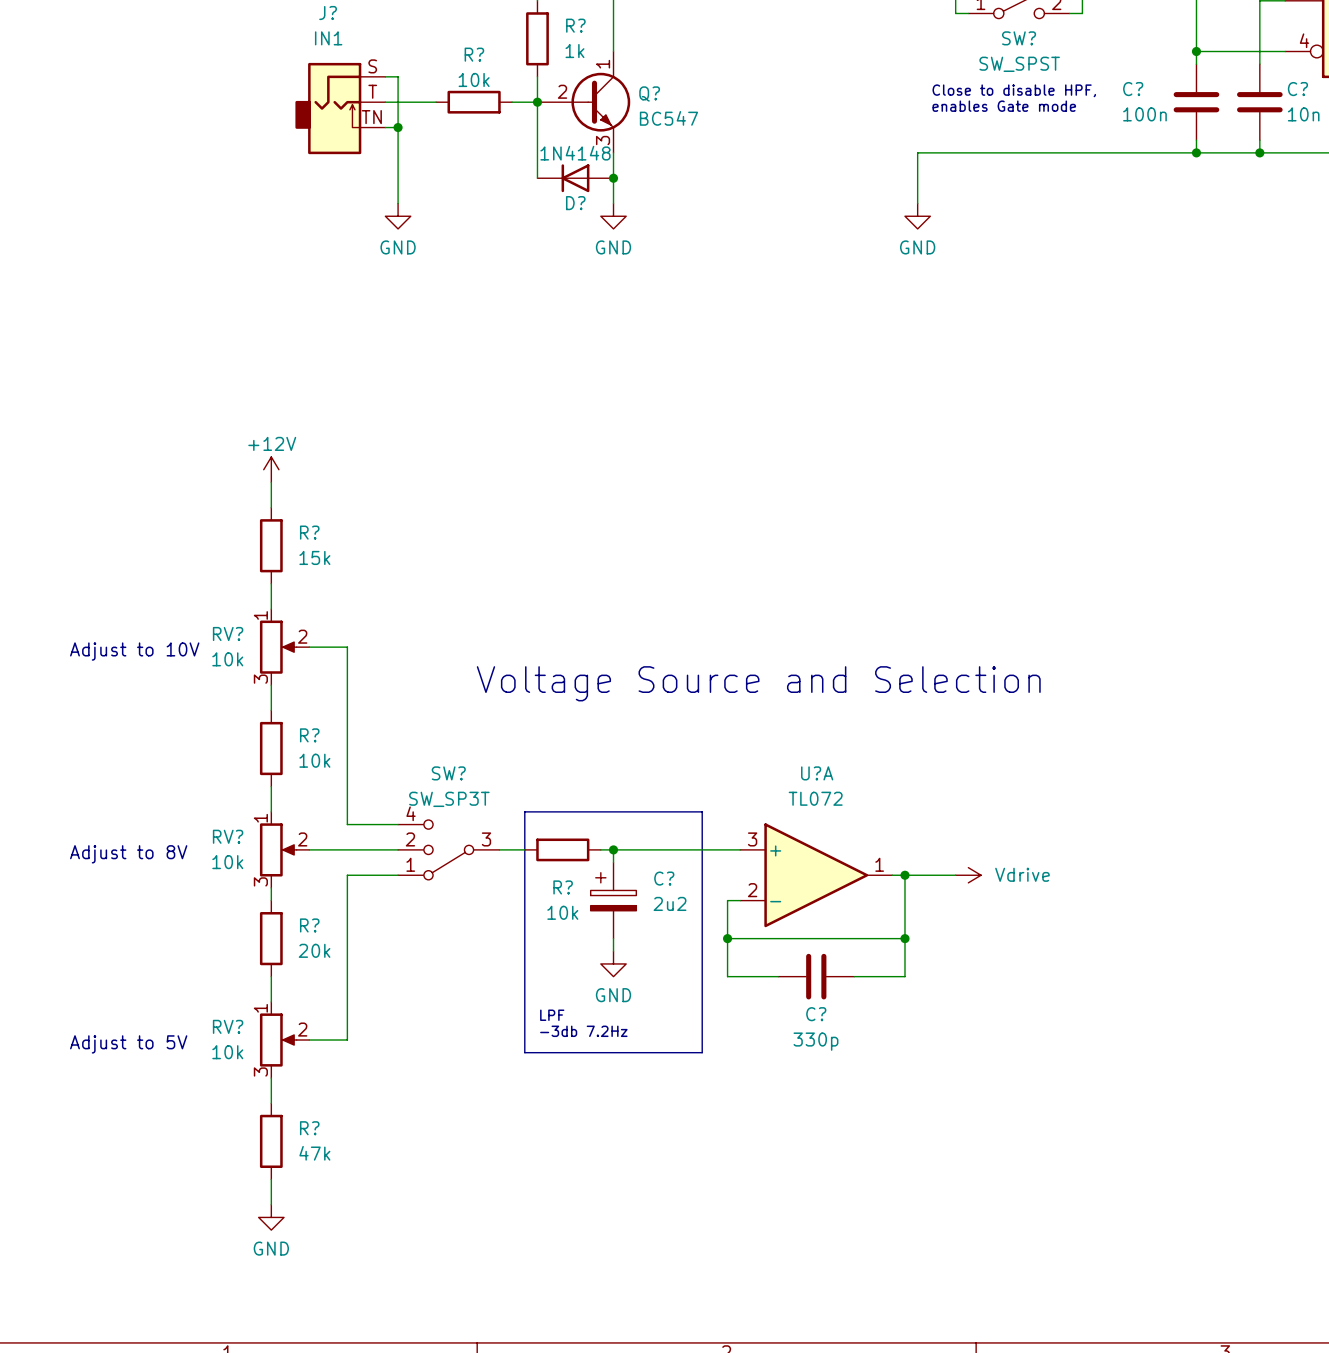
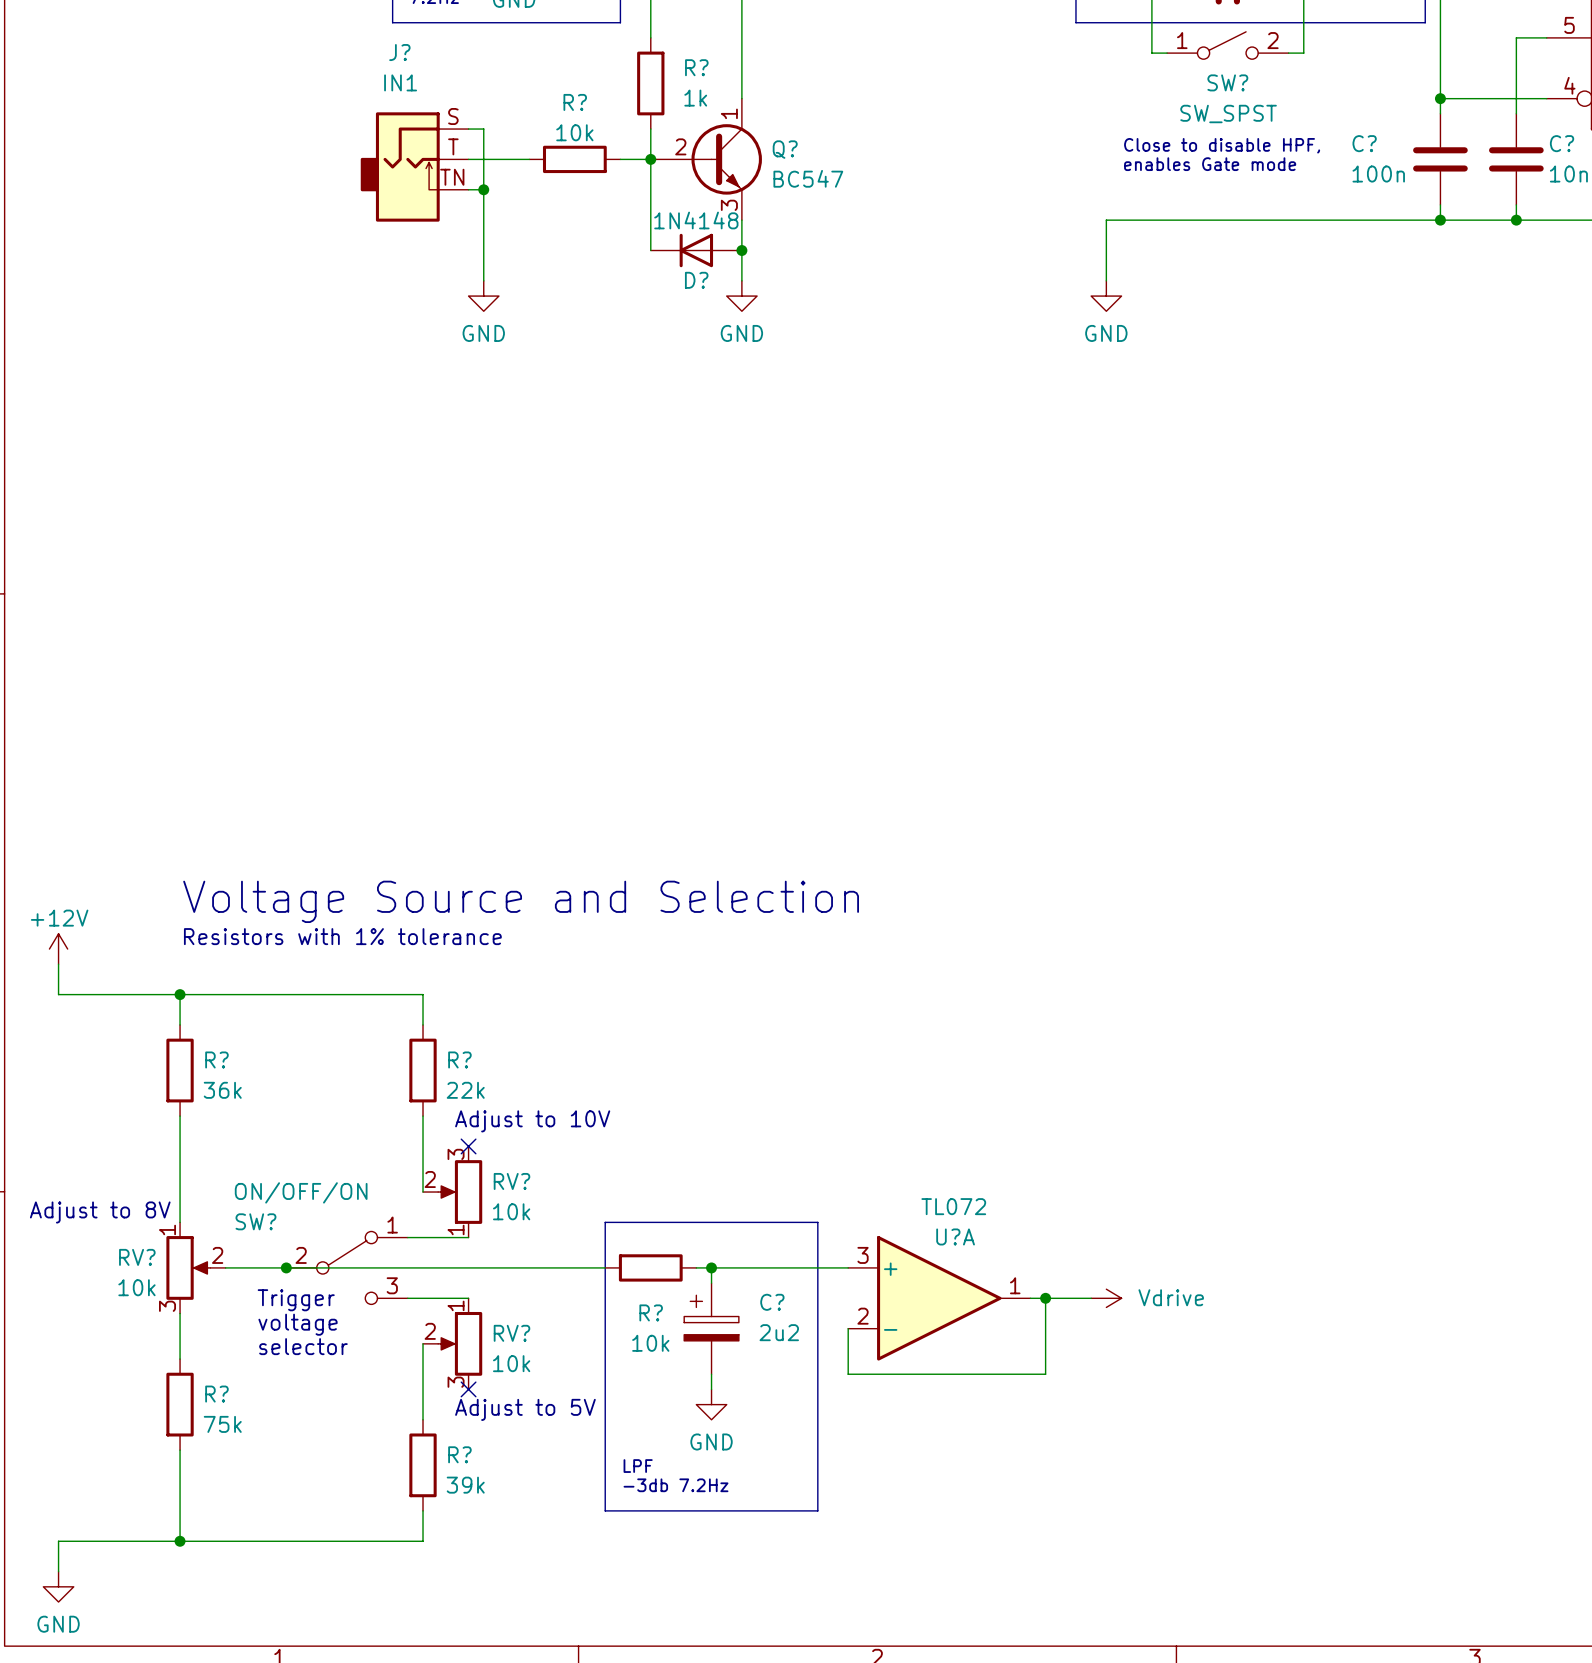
power symbol: +12V (271, 469) -> none
wire: (271, 482) (271, 507) -> none
R?: 15k (271, 545) -> none
wire: (271, 583) (271, 609) -> none
RV?: 10k (284, 647) -> none
wire: (309, 647) (347, 647) (347, 799) -> (58, 964) (58, 994) (423, 994)
text: Adjust to 10V (134, 651) -> none
text: Voltage Source and Selection (758, 683) -> none
wire: (271, 685) (271, 710) -> none
text: none -> Voltage Source and Selection (521, 901)
R?: 10k (271, 748) -> none
text: none -> Resistors with 1% tolerance (342, 936)
power symbol: none -> +12V (58, 949)
U?A name position: U?A (817, 773) -> U?A (955, 1236)
wire: (271, 786) (271, 811) -> (180, 994) (180, 1024)
U?A value position: TL072 (815, 798) -> TL072 (953, 1206)
junction: none -> (180, 994)
line: (524, 811) (524, 1052) (702, 1052) (702, 811) (524, 811) -> (605, 1222) (605, 1510) (817, 1510) (817, 1222) (605, 1222)
wire: (347, 824) (398, 824) -> (407, 1237) (468, 1237)
RV?: 10k (284, 849) -> none
wire: (309, 849) (398, 849) -> none
SW?: SW_SP3T (448, 849) -> none
wire: (499, 849) (524, 849) -> none
R? position: (562, 849) -> (650, 1267)
wire: (600, 849) (740, 849) -> none
wire: (613, 849) (613, 862) -> (711, 1267) (711, 1283)
junction: (613, 849) -> none
text position: Adjust to 8V (128, 854) -> Adjust to 8V (100, 1212)
R?: none -> 36k (180, 1070)
R?: none -> 22k (423, 1070)
wire: (398, 875) (347, 875) (347, 900) -> none
U?A position: (816, 875) -> (939, 1298)
wire: (892, 875) (955, 875) -> none
wire: (904, 875) (904, 976) (854, 976) -> none
junction: (904, 875) -> none
power symbol position: Vdrive (968, 875) -> Vdrive (1106, 1298)
wire: (271, 887) (271, 900) -> none
wire: none -> (180, 1116) (180, 1222)
C? position: (613, 900) -> (711, 1328)
wire: (740, 900) (727, 900) (727, 976) (778, 976) -> none
text: none -> Adjust to 10V (532, 1121)
no-connect mark: none -> (468, 1146)
R?: 20k (271, 938) -> none
wire: (613, 938) (613, 951) -> (711, 1374) (711, 1389)
wire: (727, 938) (904, 938) -> none
junction: (727, 938) -> none
junction: (904, 938) -> none
wire: (347, 963) (347, 1040) (309, 1040) -> none
RV?: none -> 10k (452, 1192)
power symbol: GND (613, 963) -> none
wire: (271, 976) (271, 1001) -> none
C?: 330p (816, 976) -> none
text position: LPF (552, 1015) -> LPF (638, 1466)
RV?: none -> 10k (195, 1267)
wire: none -> (225, 1267) (605, 1267)
junction: none -> (286, 1267)
SW?: none -> ON/OFF/ON (347, 1267)
wire: none -> (696, 1267) (848, 1267)
junction: none -> (711, 1267)
text position: -3db 7.2Hz (583, 1031) -> -3db 7.2Hz (675, 1485)
RV?: 10k (284, 1040) -> none
text: Adjust to 5V (128, 1044) -> none
wire: none -> (407, 1298) (468, 1298)
wire: none -> (1030, 1298) (1091, 1298)
wire: none -> (1045, 1298) (1045, 1374) (848, 1374) (848, 1328)
junction: none -> (1045, 1298)
text: none -> Trigger (296, 1300)
wire: none -> (180, 1313) (180, 1359)
text: none -> voltage (298, 1324)
wire: (271, 1078) (271, 1103) -> none
wire: none -> (423, 1343) (423, 1419)
RV?: none -> 10k (452, 1343)
text: none -> selector (303, 1346)
no-connect mark: none -> (468, 1389)
R?: none -> 75k (180, 1404)
R?: 47k (271, 1141) -> none
power symbol: none -> GND (711, 1404)
text: none -> Adjust to 5V (525, 1409)
wire: none -> (180, 1450) (180, 1541)
wire: (271, 1179) (271, 1204) -> none
R?: none -> 39k (423, 1465)
power symbol: GND (271, 1217) -> none
wire: none -> (423, 1510) (423, 1541) (58, 1541) (58, 1571)
junction: none -> (180, 1541)
power symbol: none -> GND (58, 1586)

